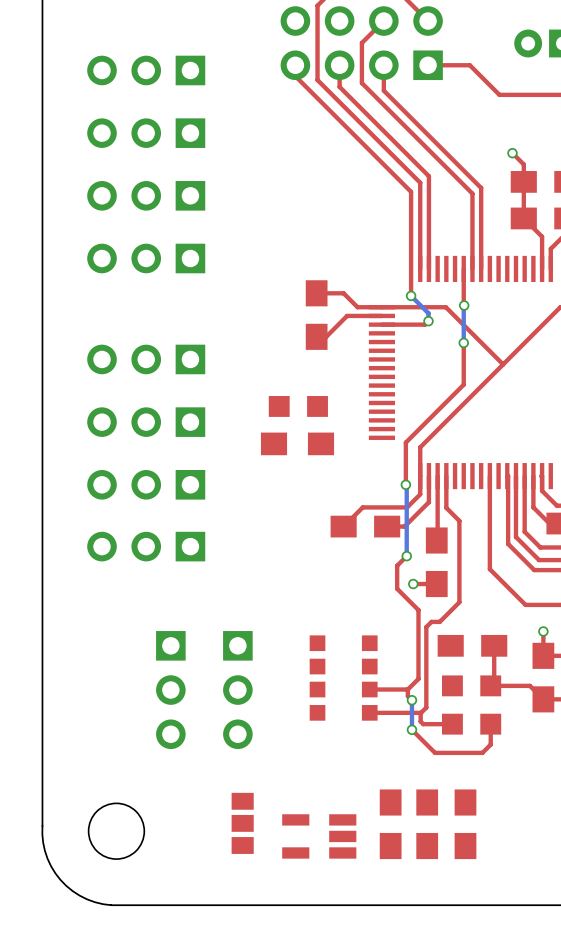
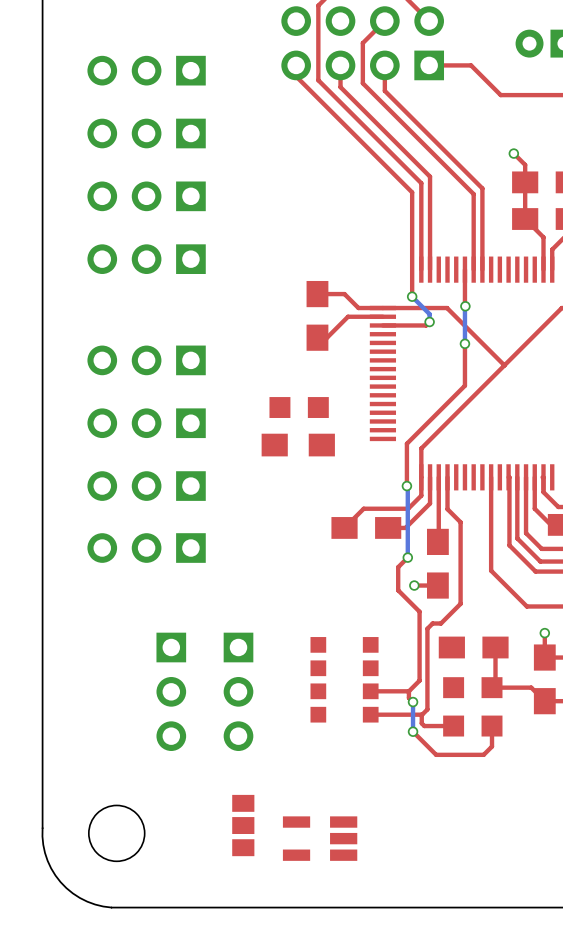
part: (390, 824) -> none
part: (427, 824) -> none
part: (465, 824) -> none

